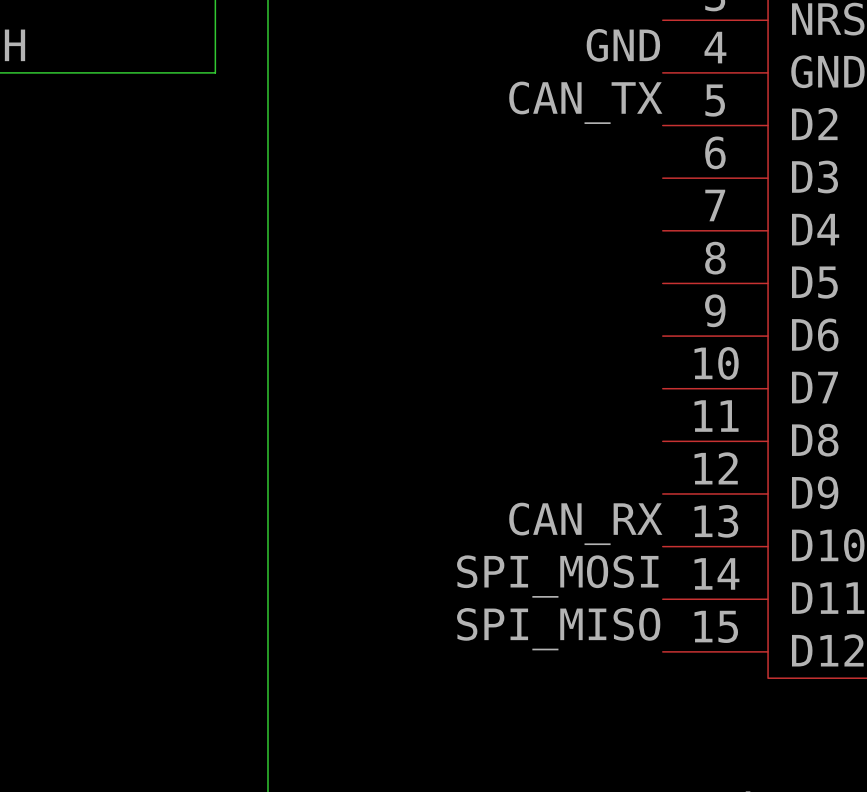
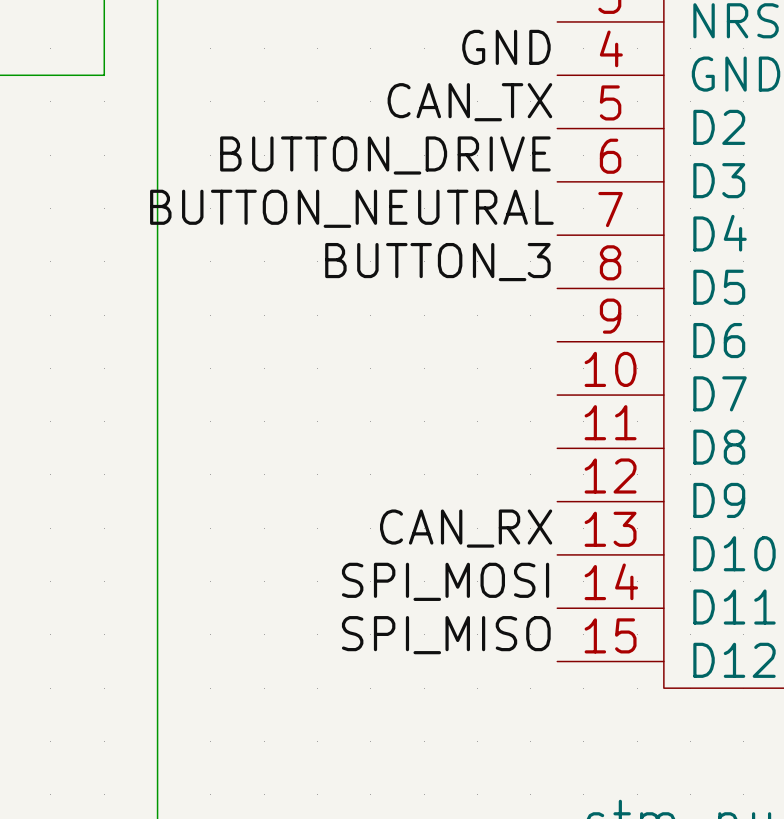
label: none -> BUTTON_DRIVE (385, 155)
label: none -> BUTTON_NEUTRAL (351, 208)
label: none -> BUTTON_3 (437, 262)

